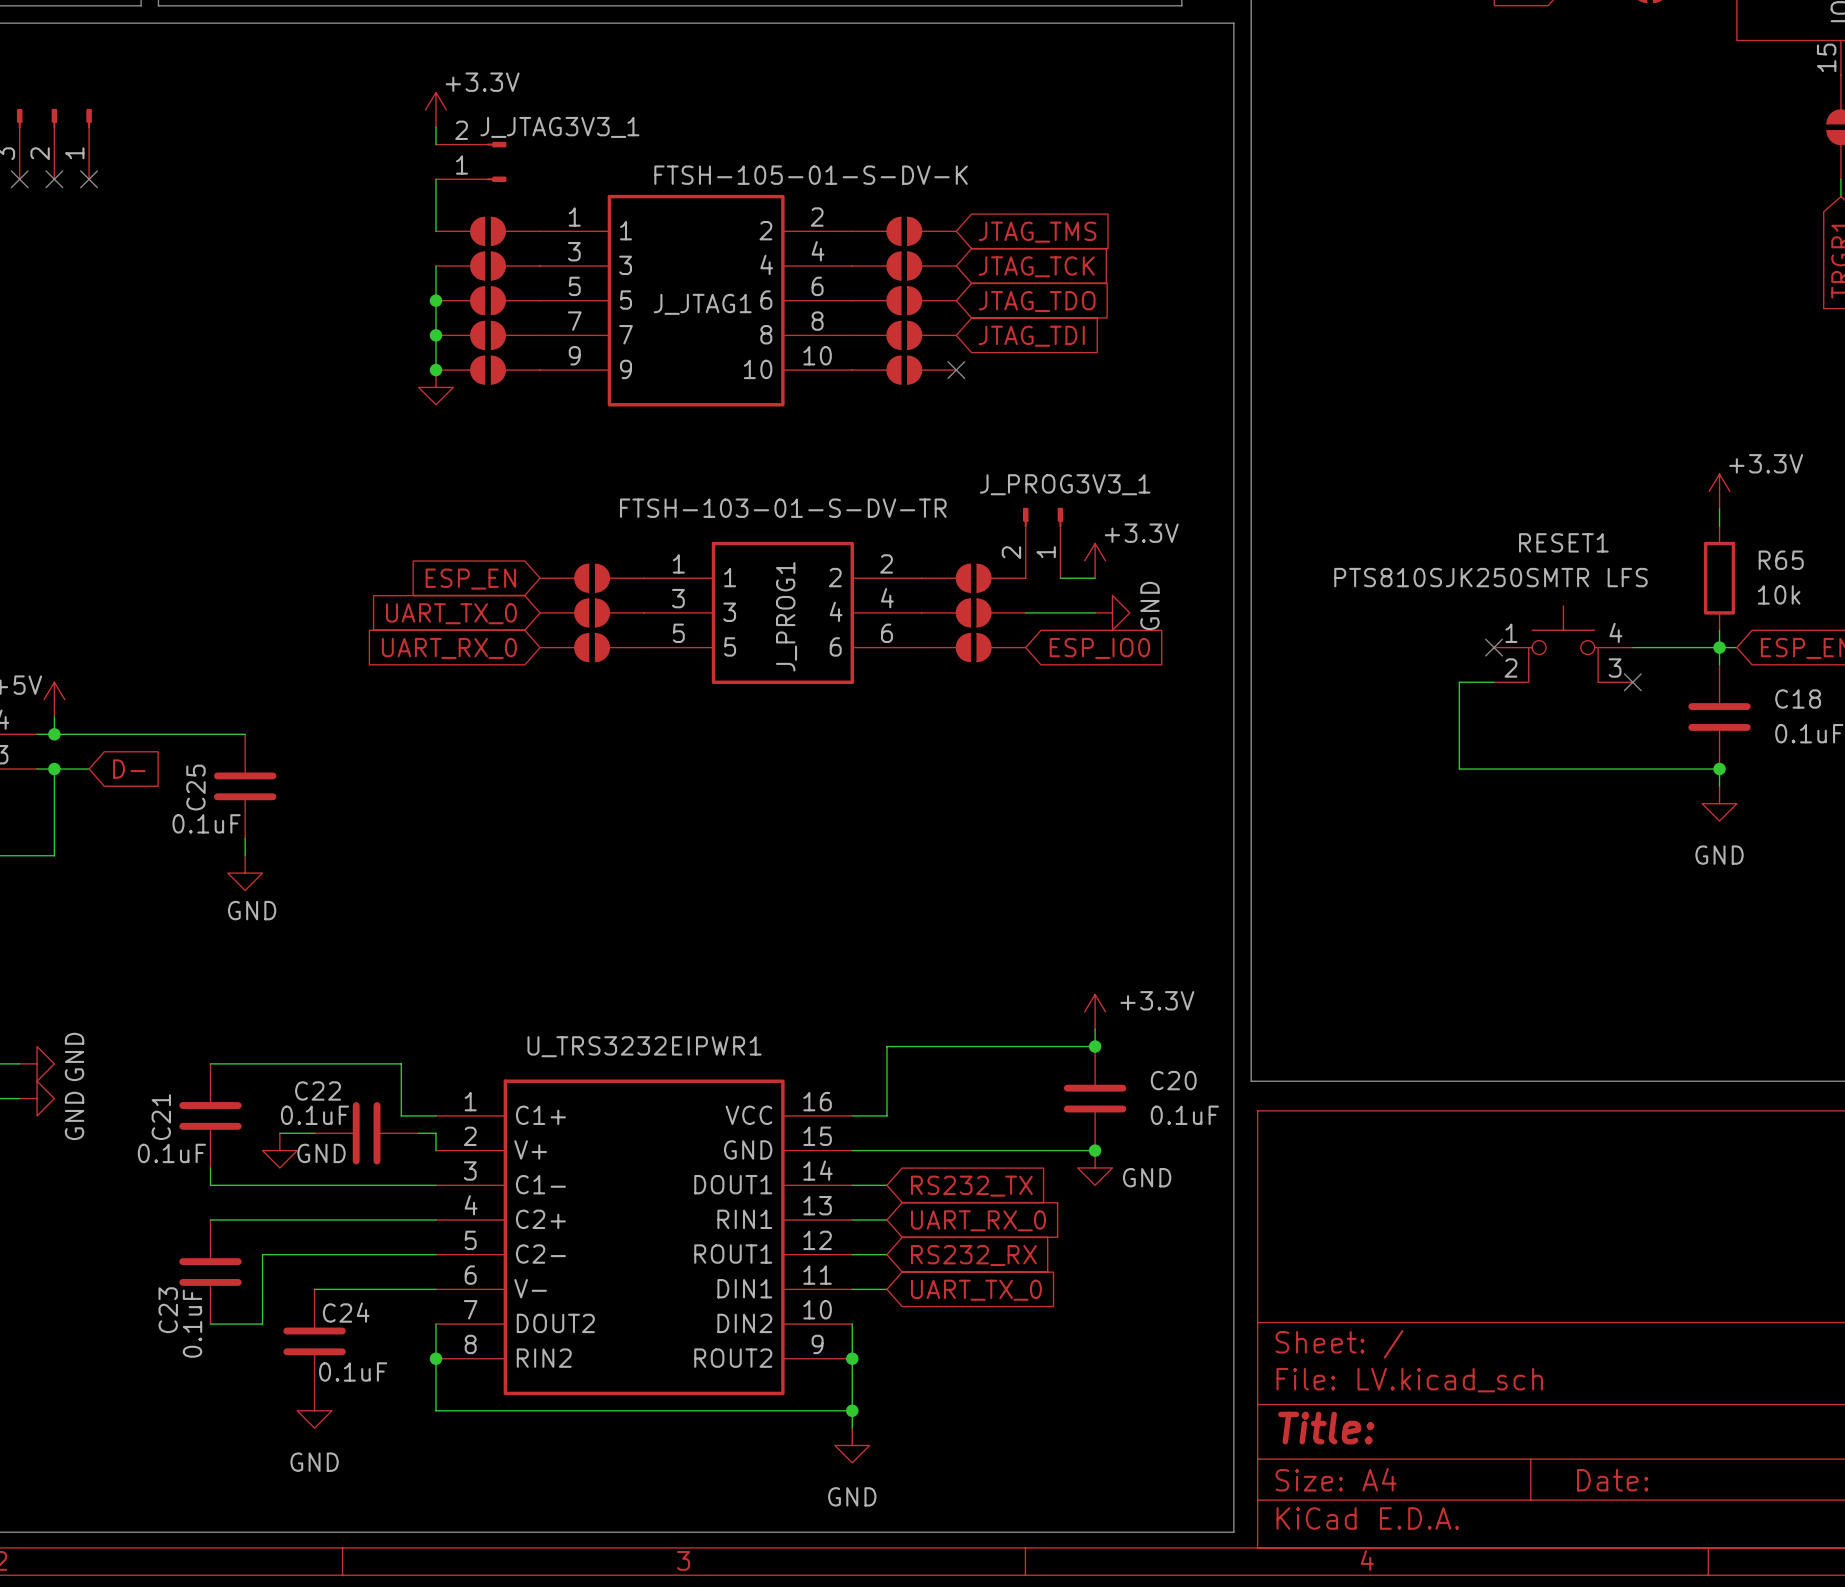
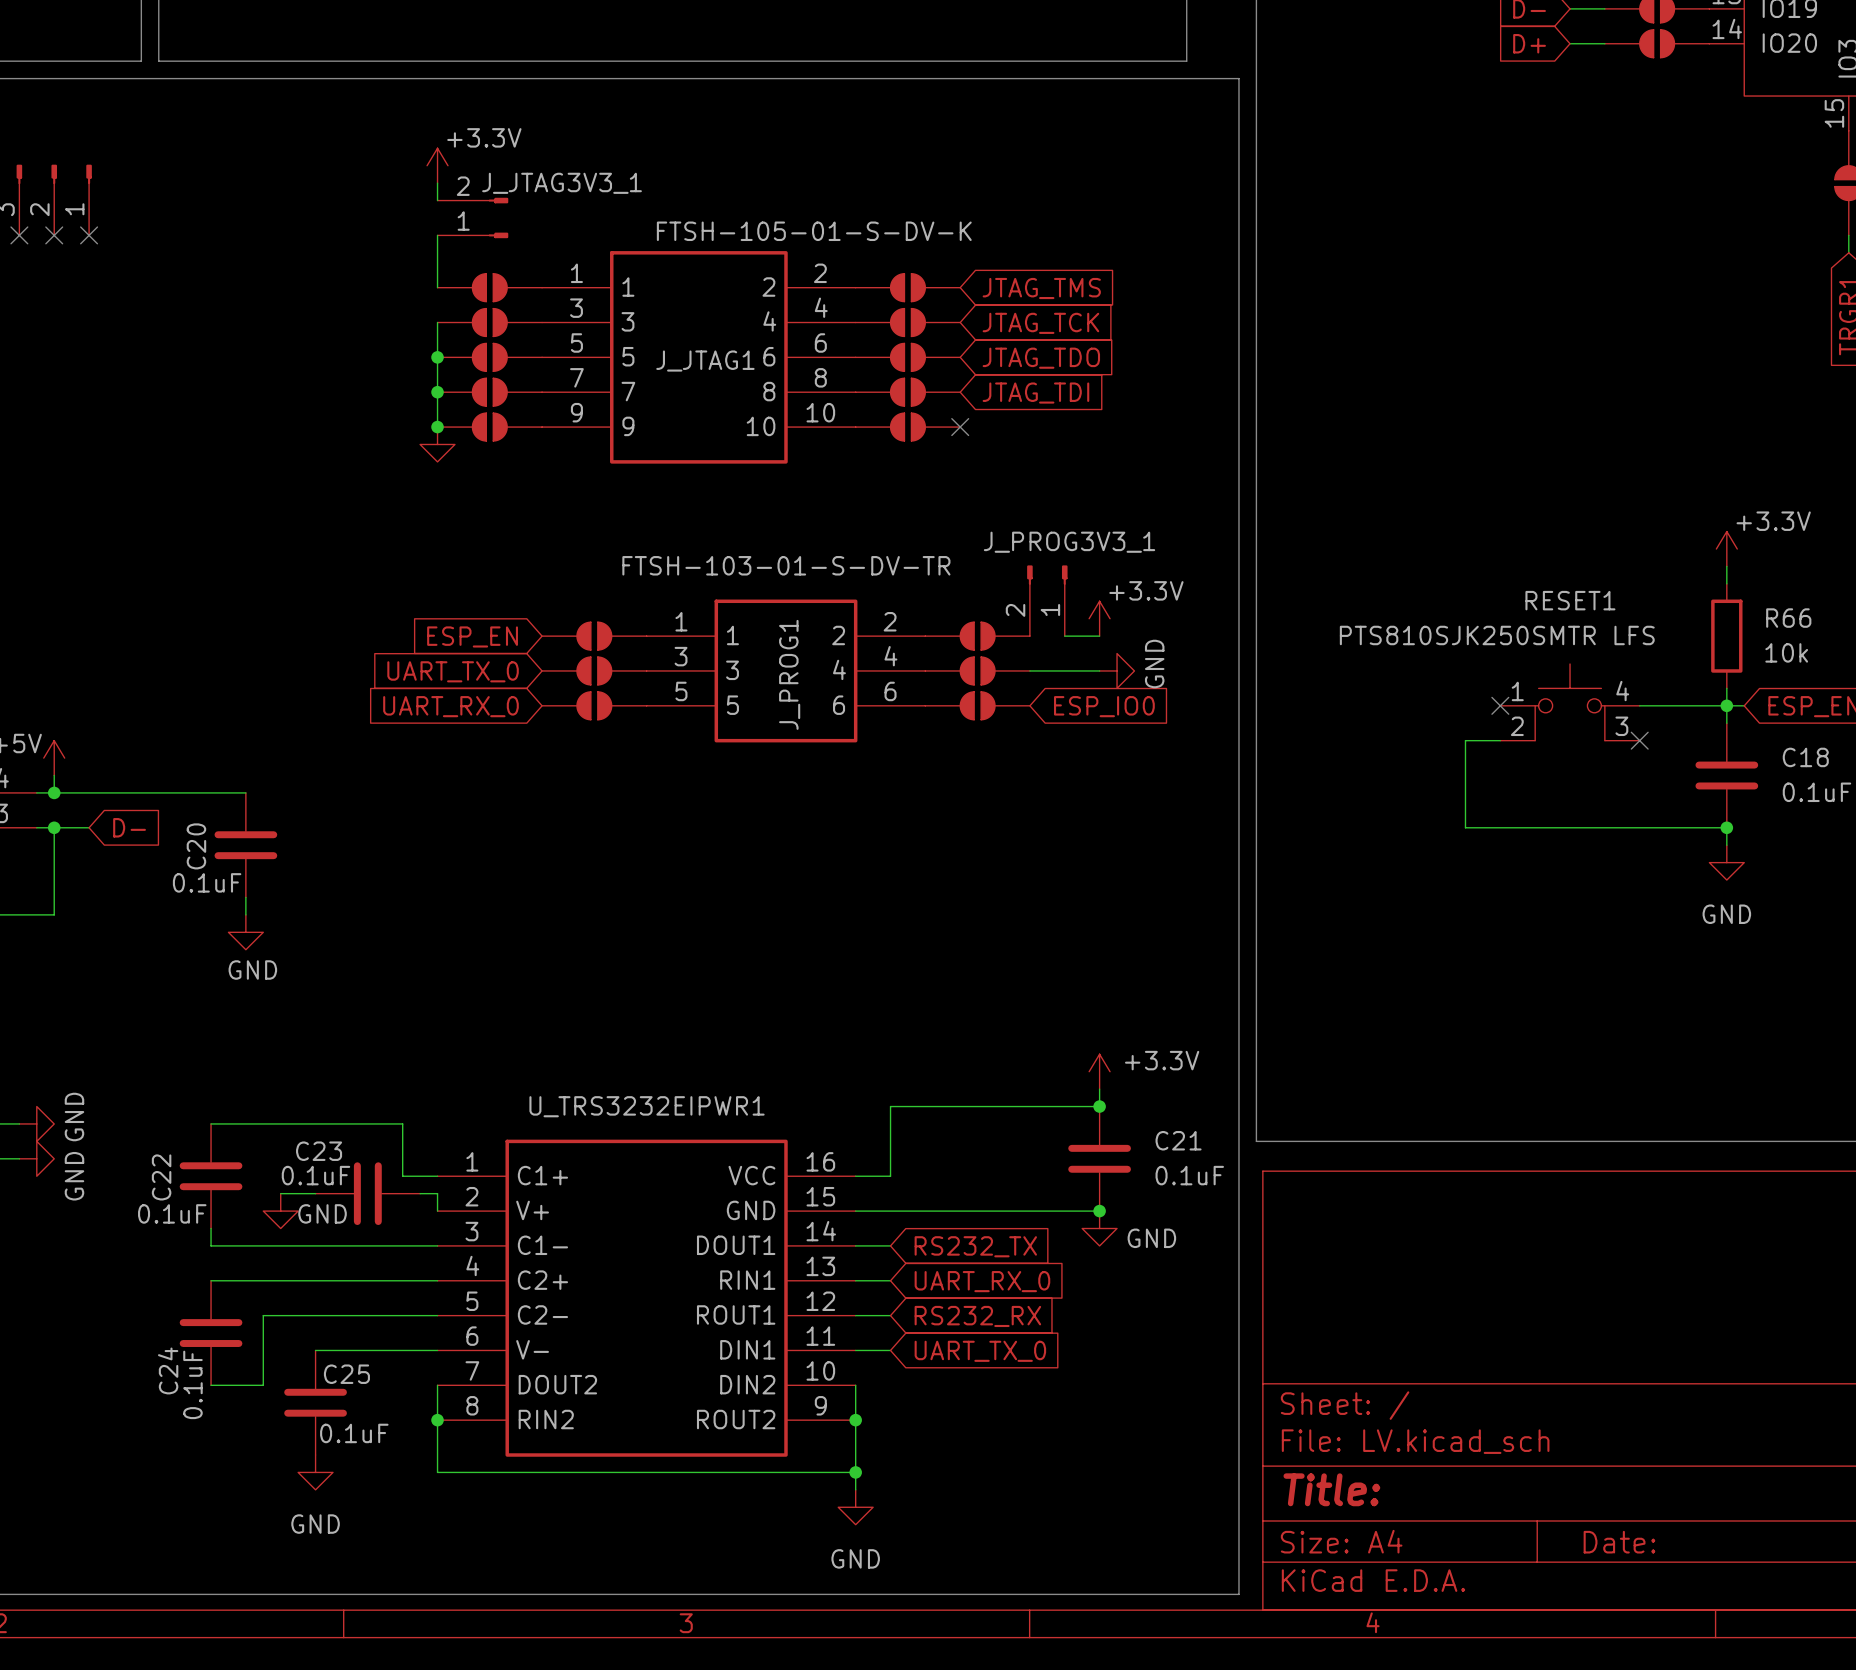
R65 name: R65 (1781, 560) -> R66 (1788, 618)
C25 name: C25 (195, 787) -> C20 (196, 846)
C20 name: C20 (1173, 1080) -> C21 (1178, 1140)
C22 name: C22 (318, 1090) -> C23 (319, 1151)
C21 name: C21 (161, 1117) -> C22 (161, 1177)
C23 name: C23 (168, 1310) -> C24 (168, 1370)
C24 name: C24 (346, 1312) -> C25 (346, 1374)

